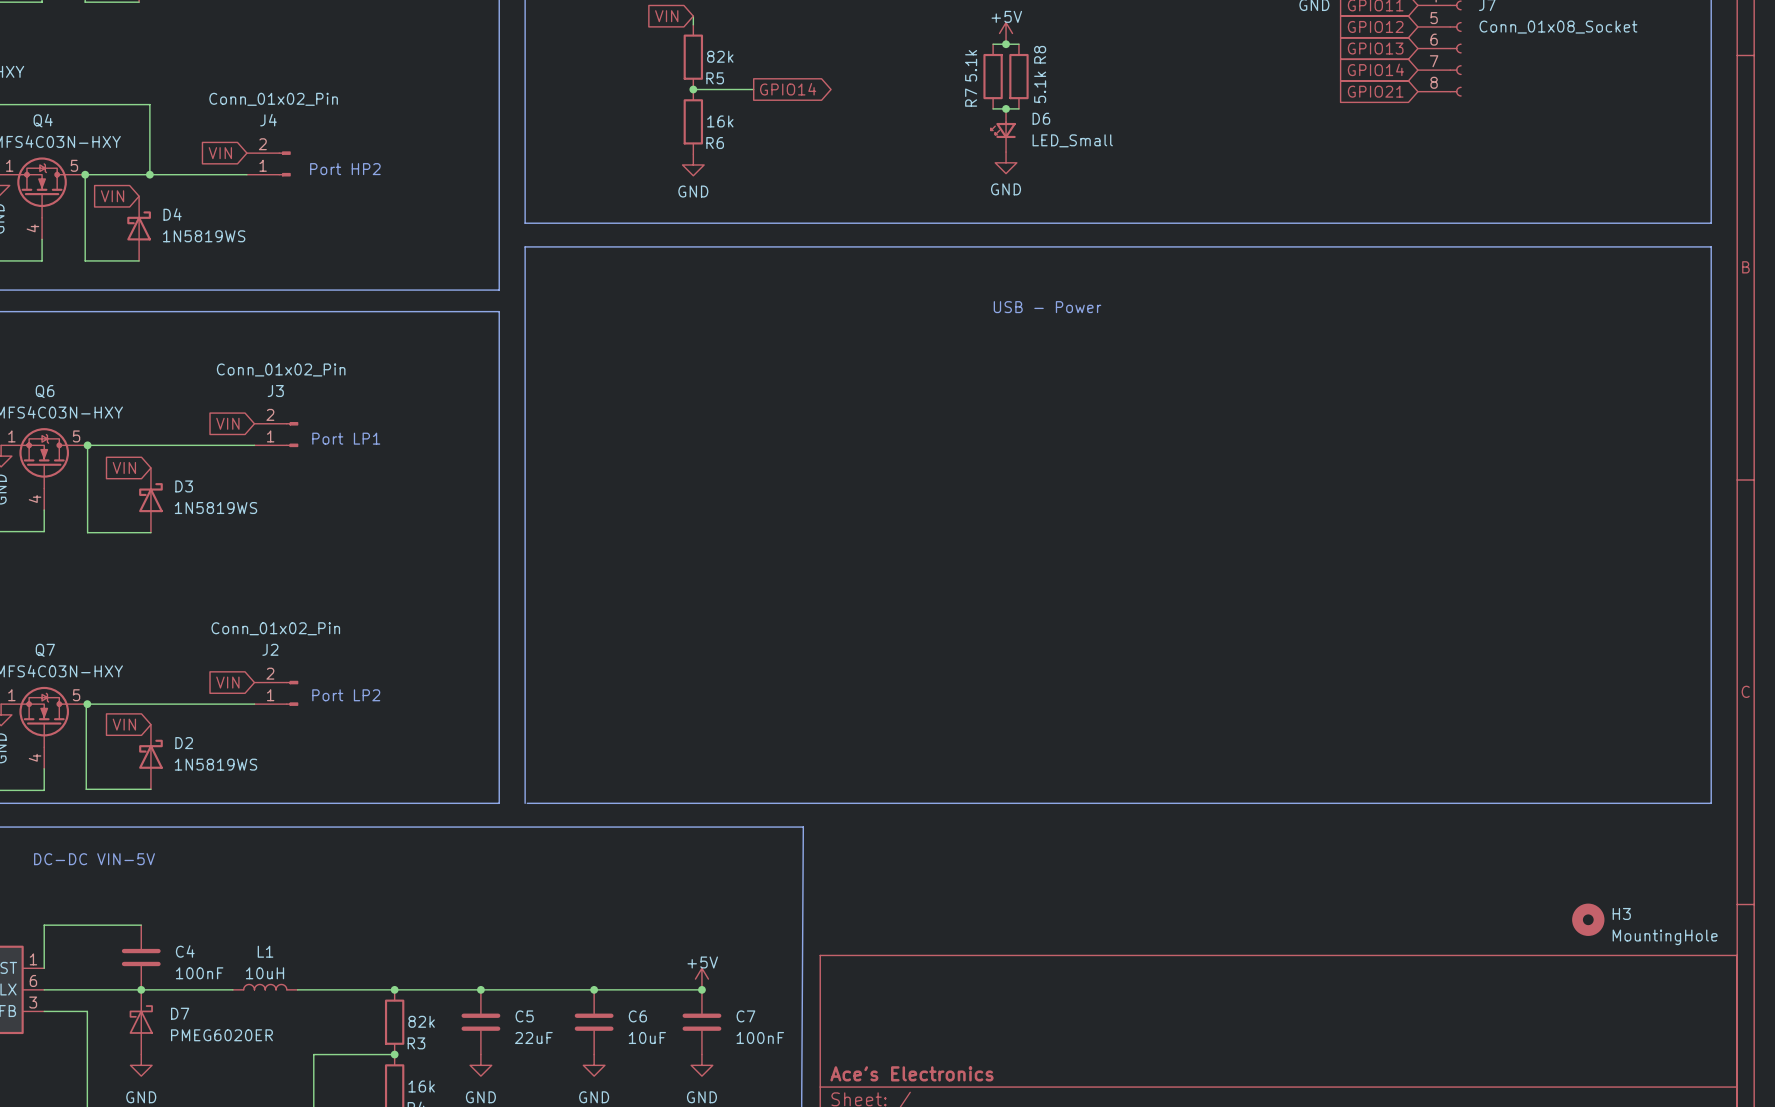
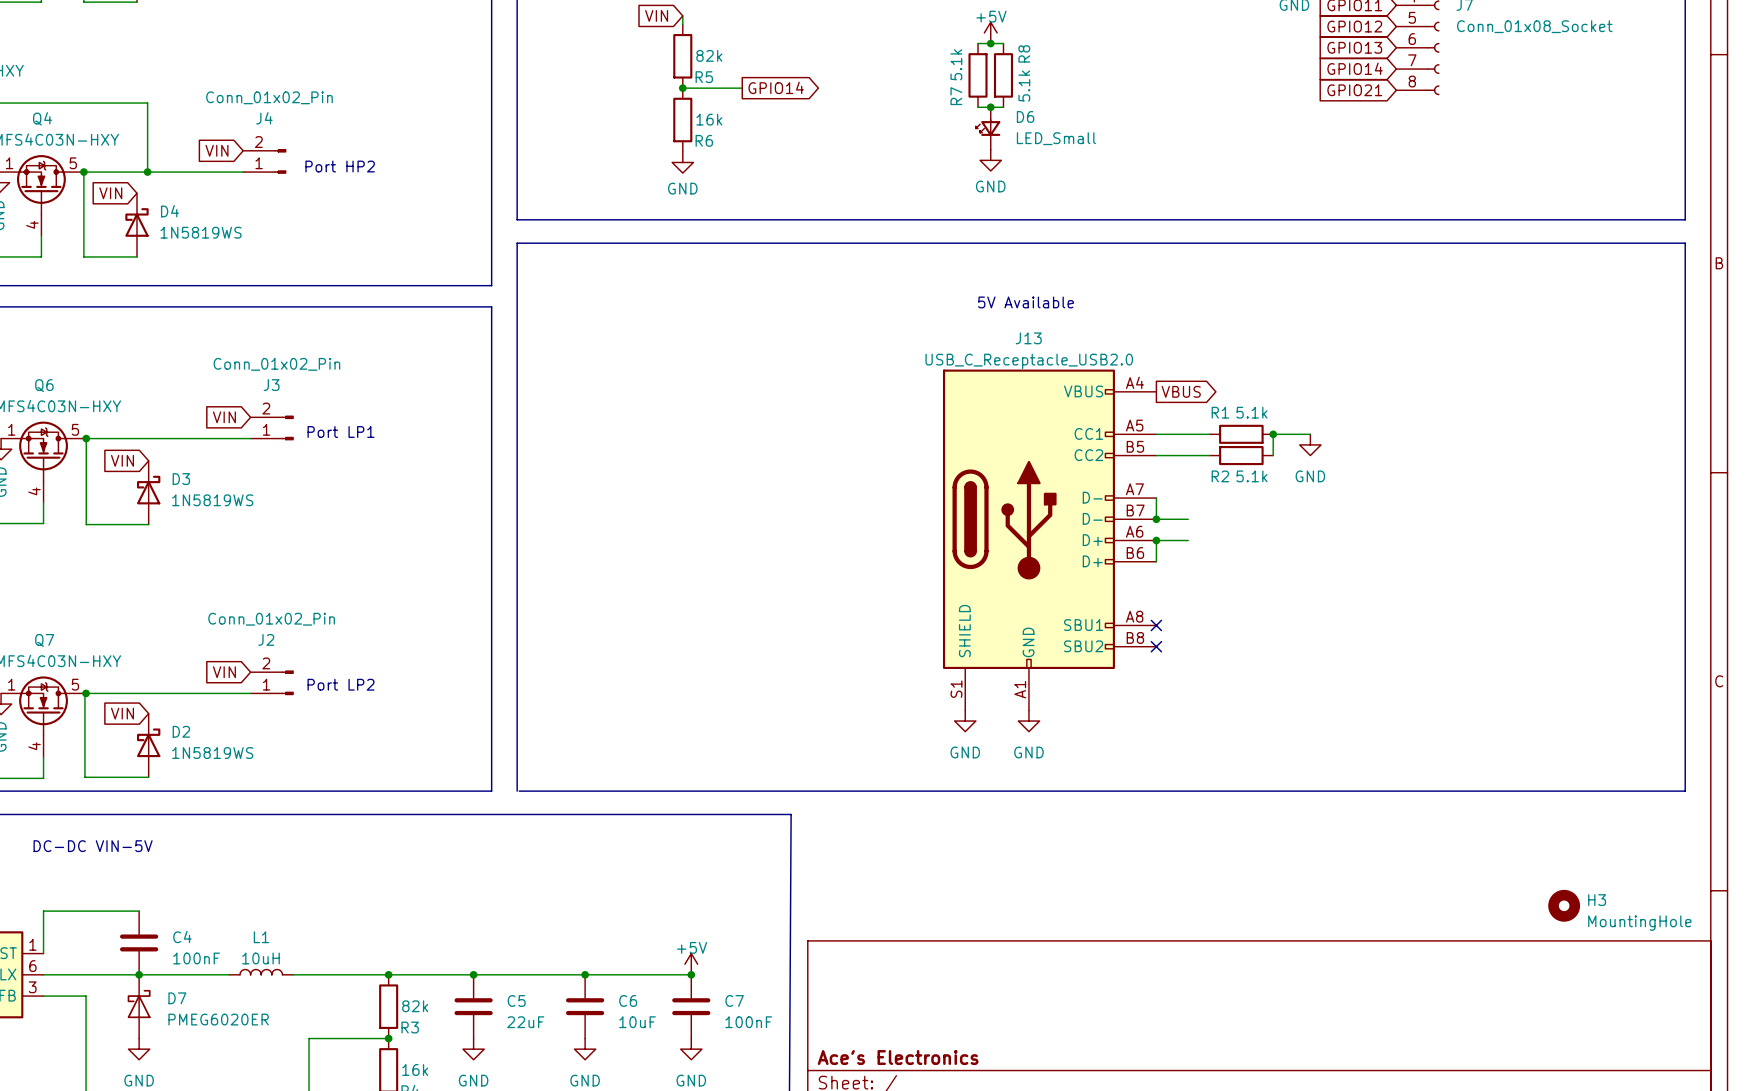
text: USB - Power (1047, 307) -> 5V Available (1026, 302)
global label: none -> VBUS (1181, 391)
wire: none -> (1156, 434) (1209, 434)
R1: none -> 5.1k (1241, 434)
junction: none -> (1273, 434)
wire: none -> (1310, 434) (1273, 434) (1273, 455)
power symbol: none -> GND (1310, 444)
wire: none -> (1156, 455) (1209, 455)
R2: none -> 5.1k (1241, 455)
wire: none -> (1156, 498) (1156, 519) (1188, 519)
junction: none -> (1156, 519)
J13: none -> USB_C_Receptacle_USB2.0 (1049, 539)
junction: none -> (1156, 540)
wire: none -> (1188, 540) (1156, 540) (1156, 561)
no-connect mark: none -> (1156, 625)
no-connect mark: none -> (1156, 646)
power symbol: none -> GND (965, 721)
power symbol: none -> GND (1028, 721)

